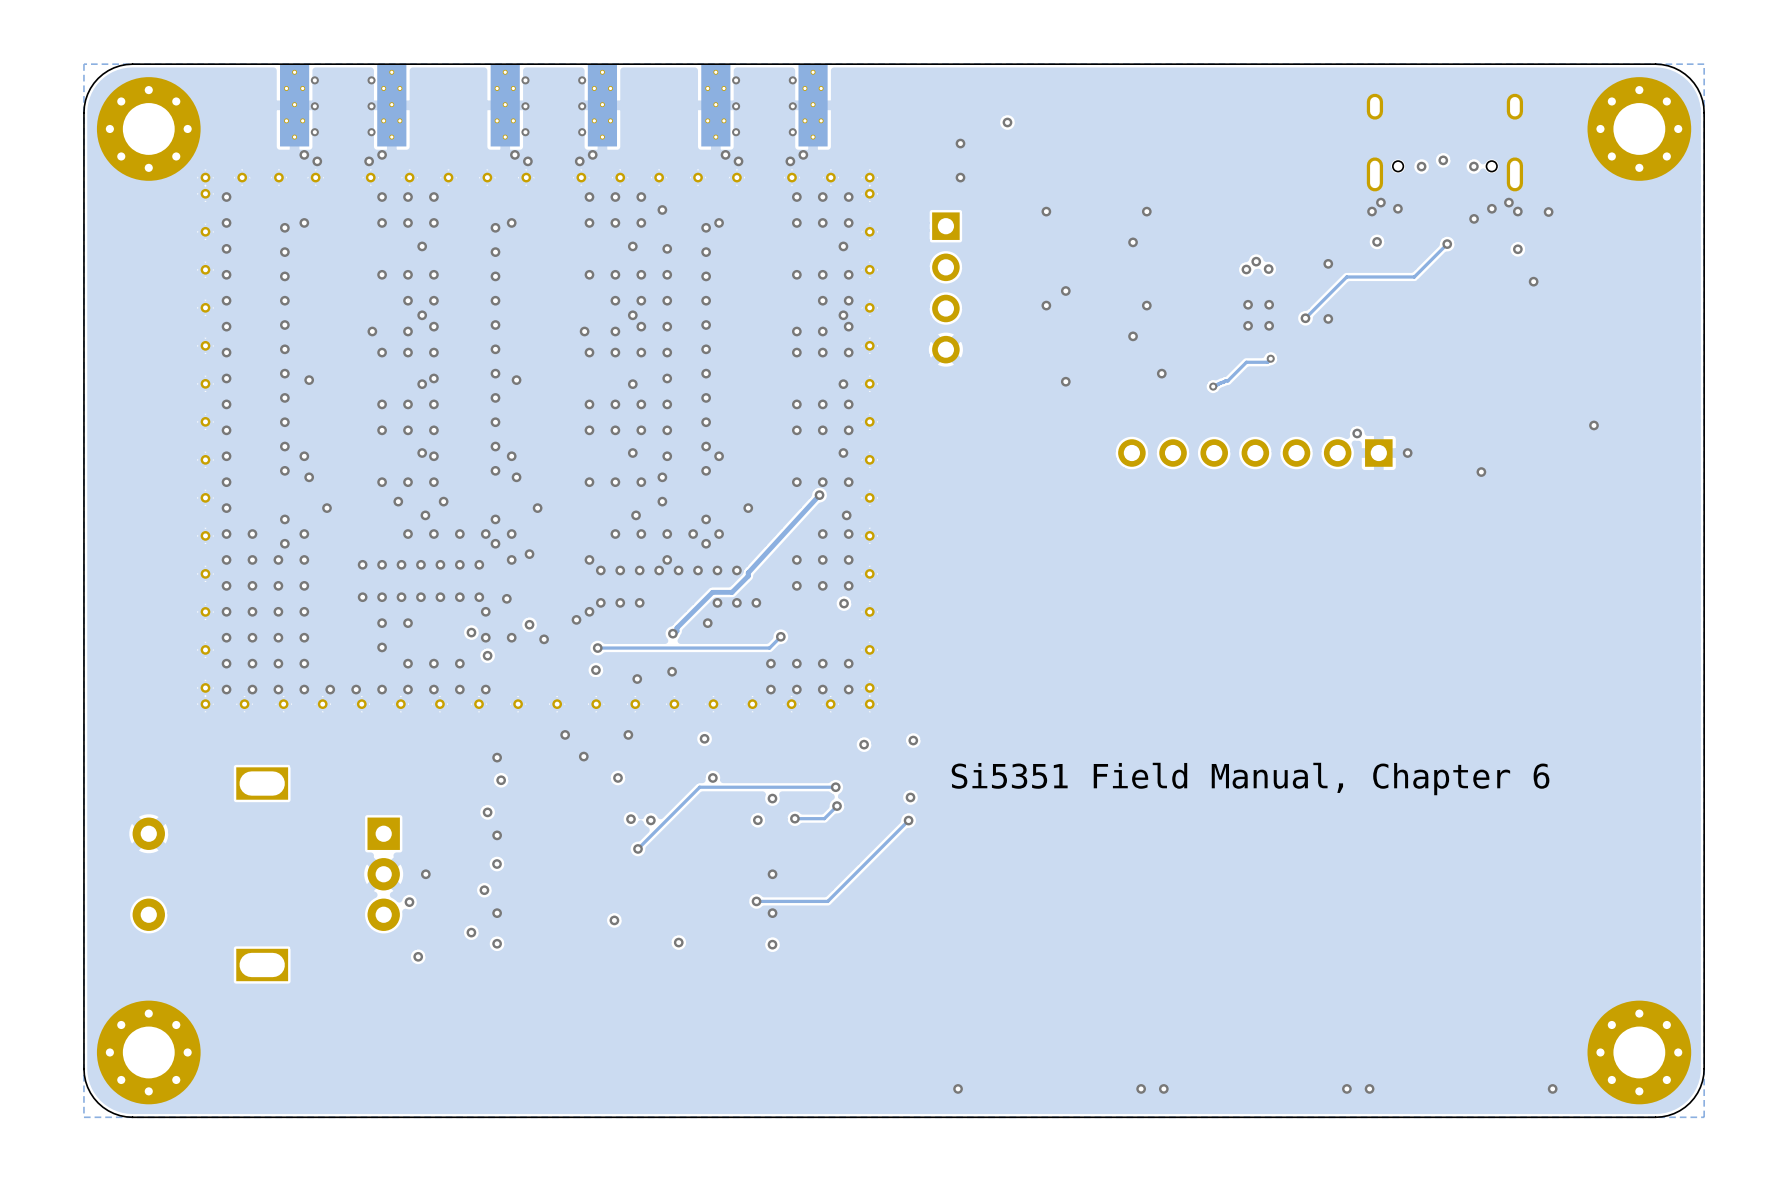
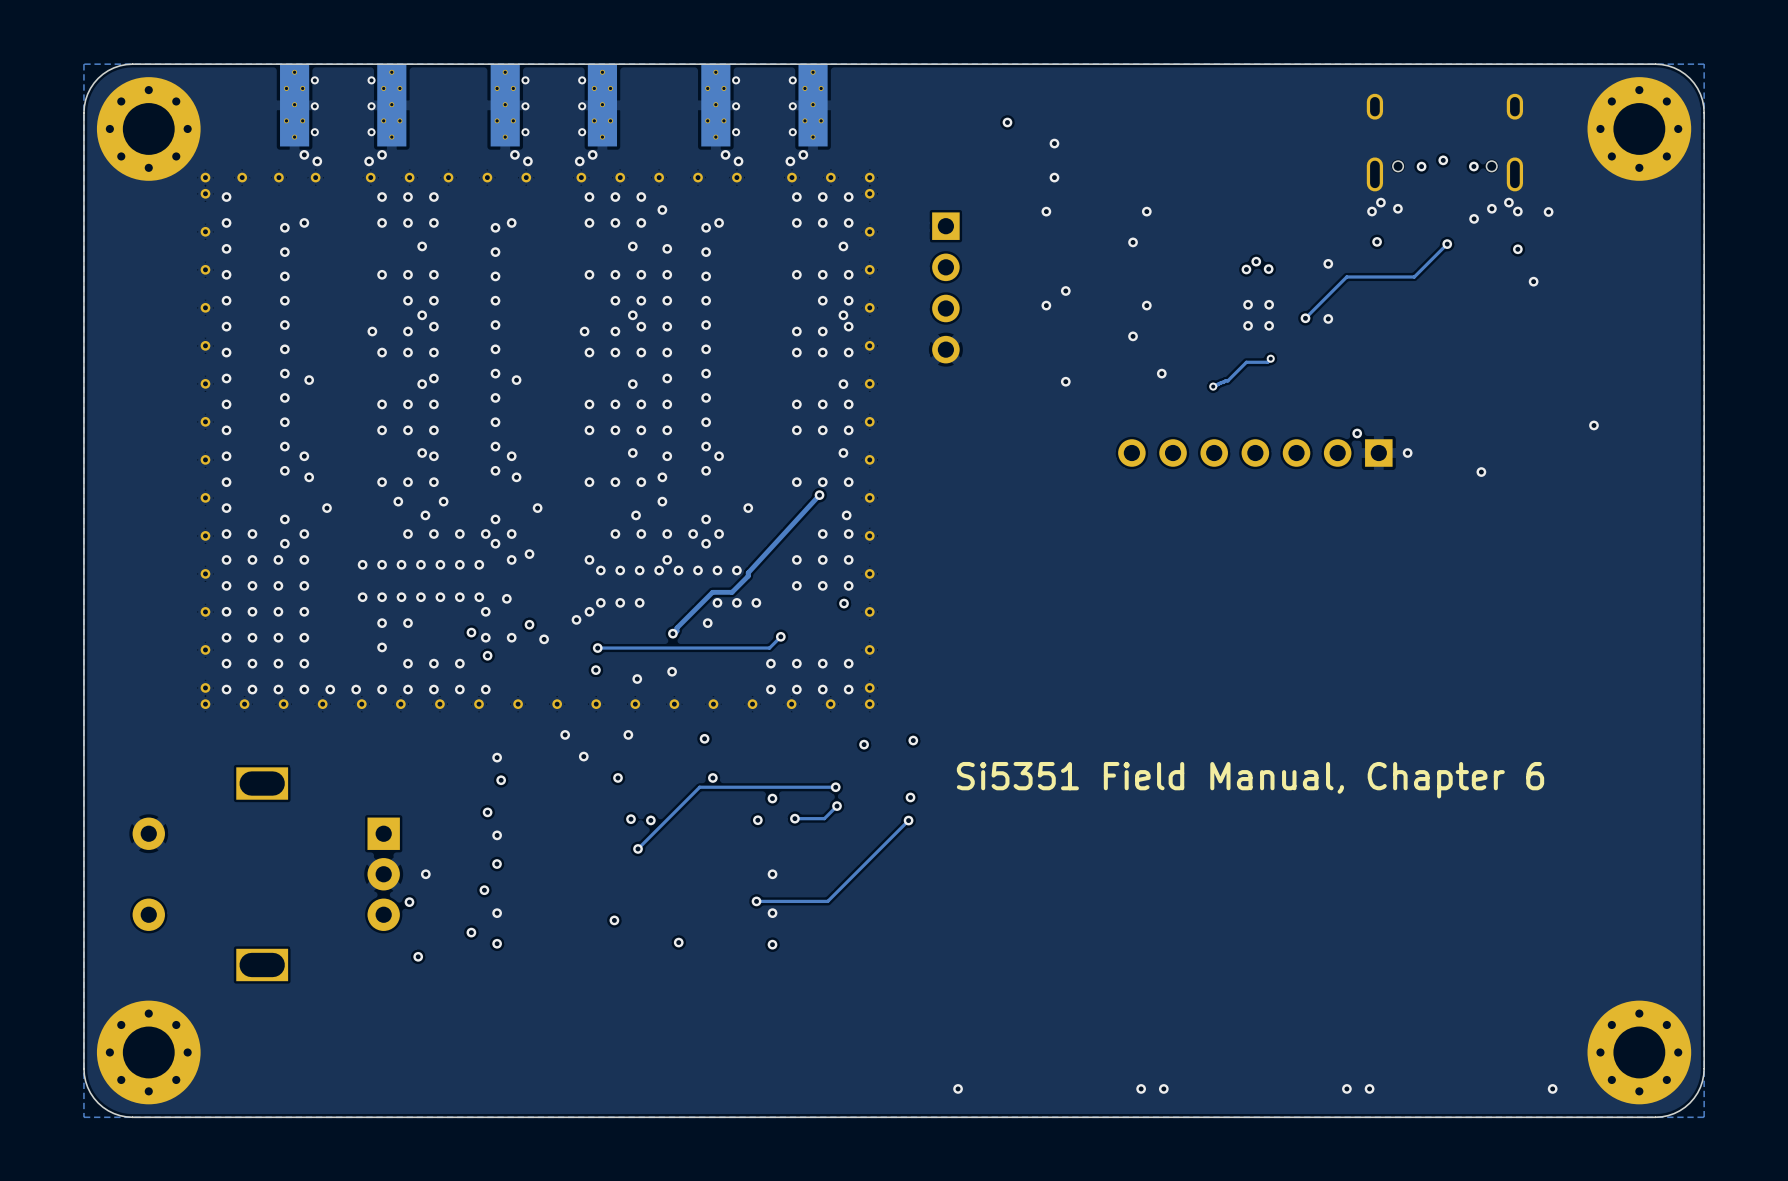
via: (960, 143) -> none
via: none -> (1054, 143)
via: (960, 177) -> none
via: none -> (1054, 177)

